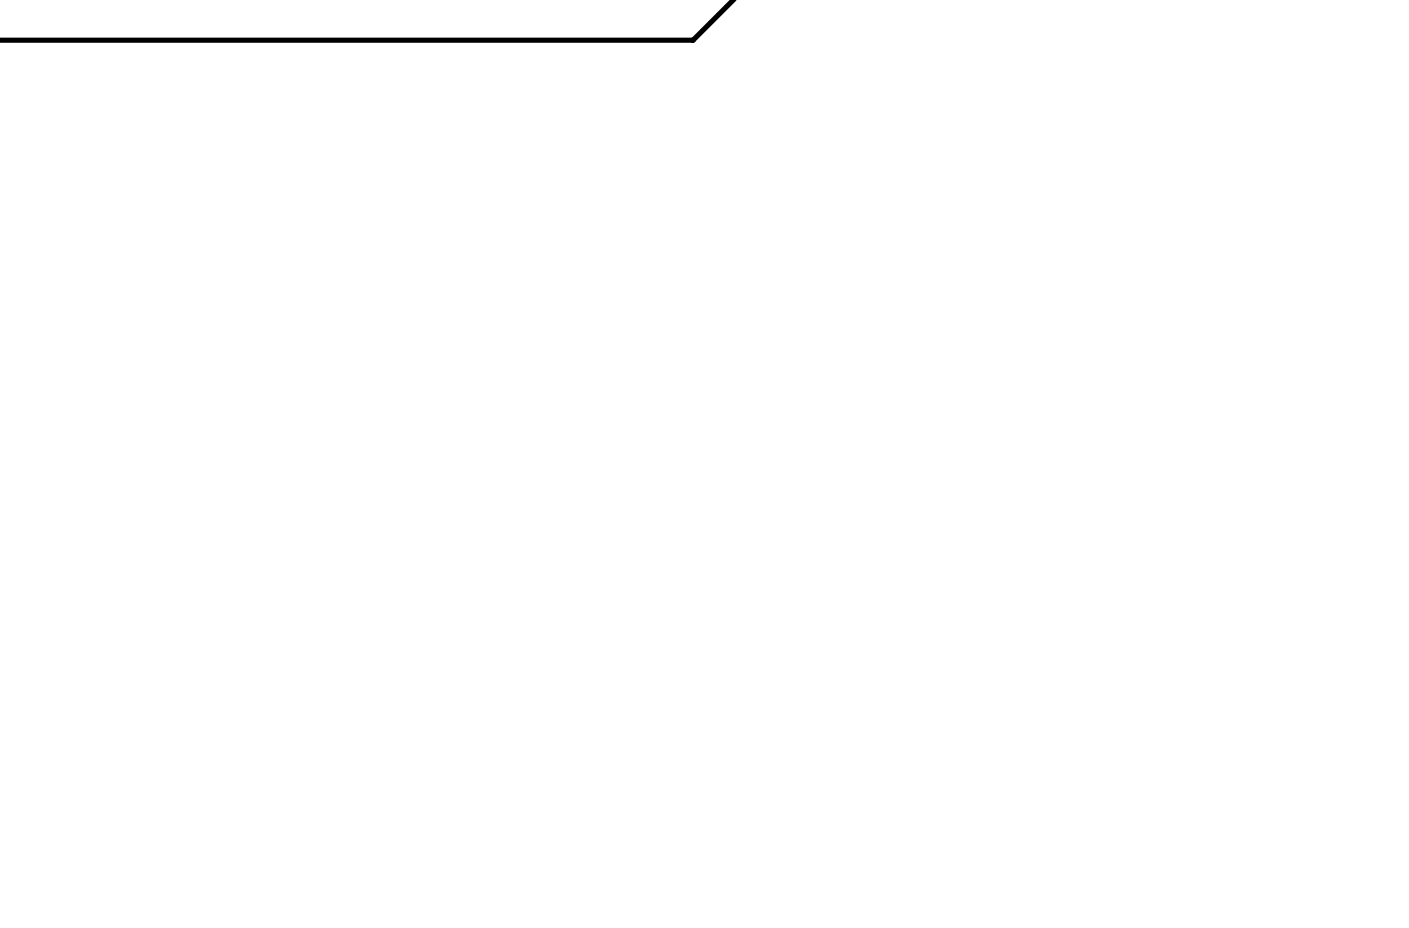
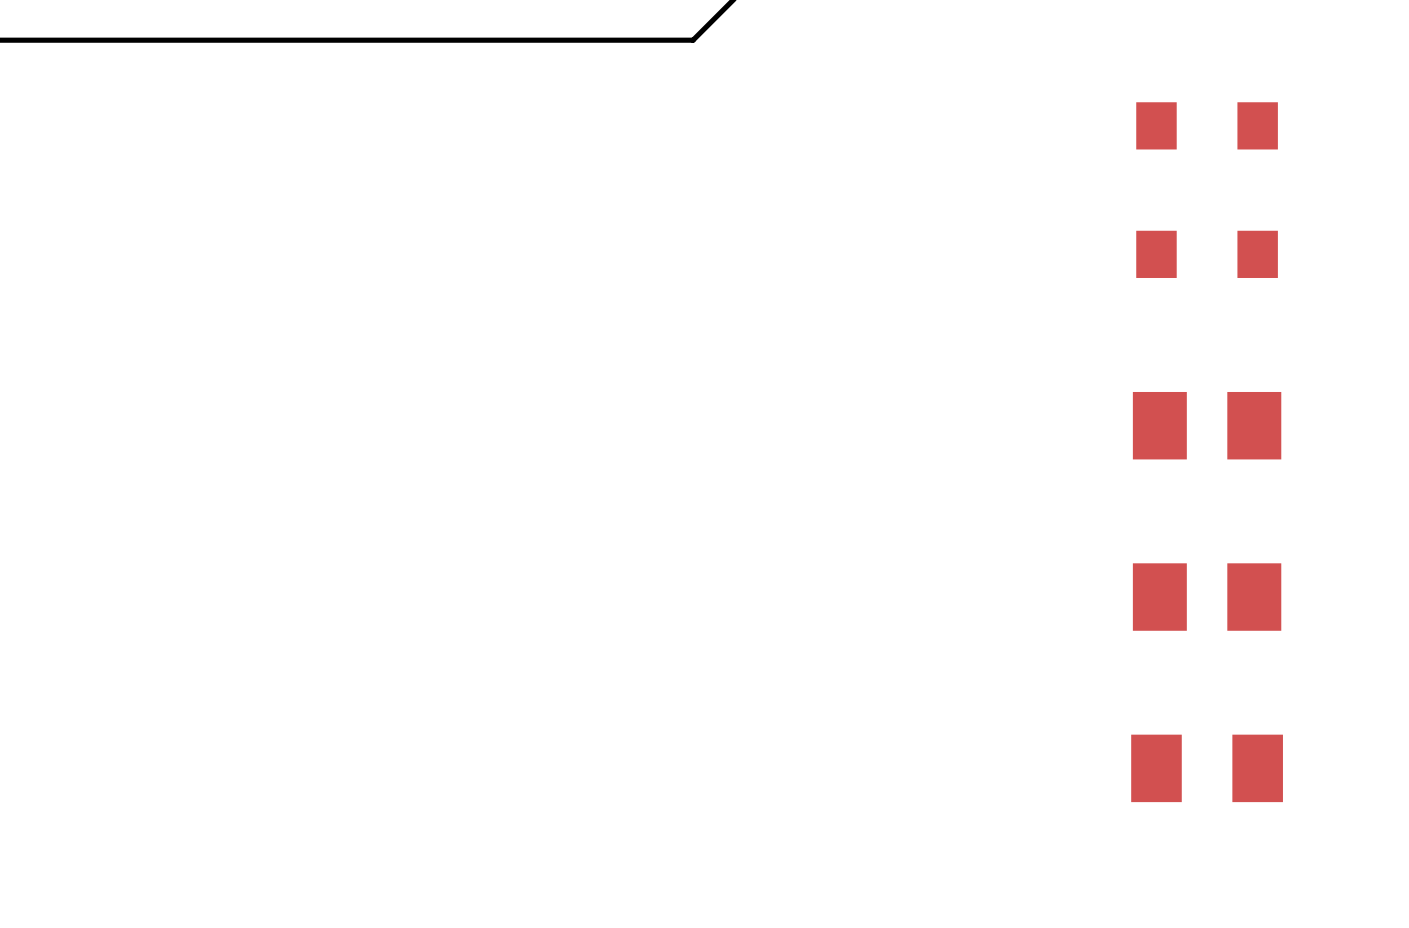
part: none -> (1207, 125)
part: none -> (1207, 254)
part: none -> (1207, 425)
part: none -> (1207, 597)
part: none -> (1207, 768)

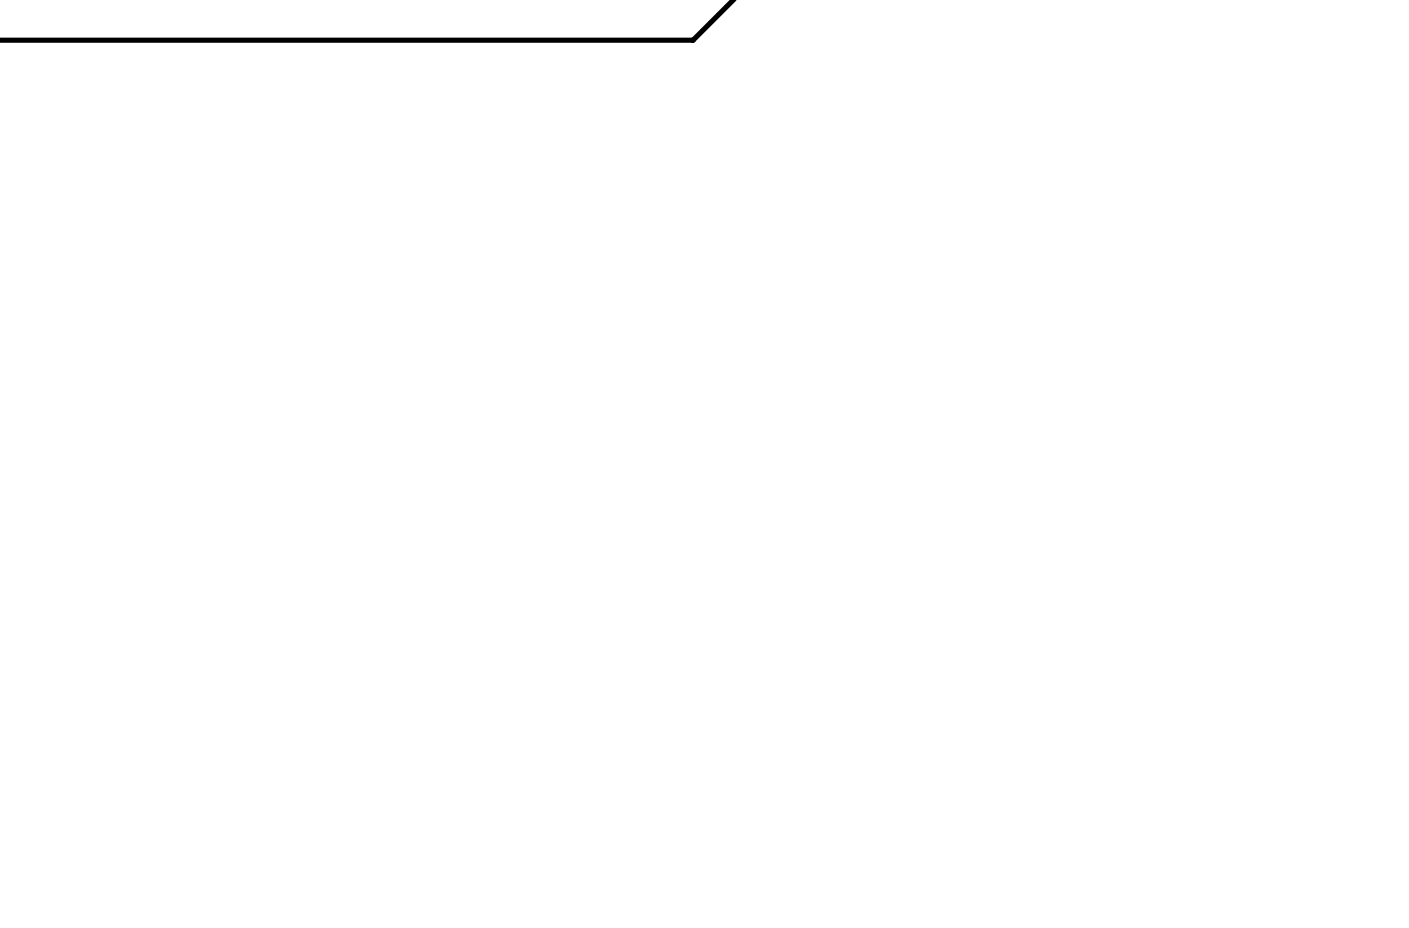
part: (1207, 125) -> none
part: (1207, 254) -> none
part: (1207, 425) -> none
part: (1207, 597) -> none
part: (1207, 768) -> none

